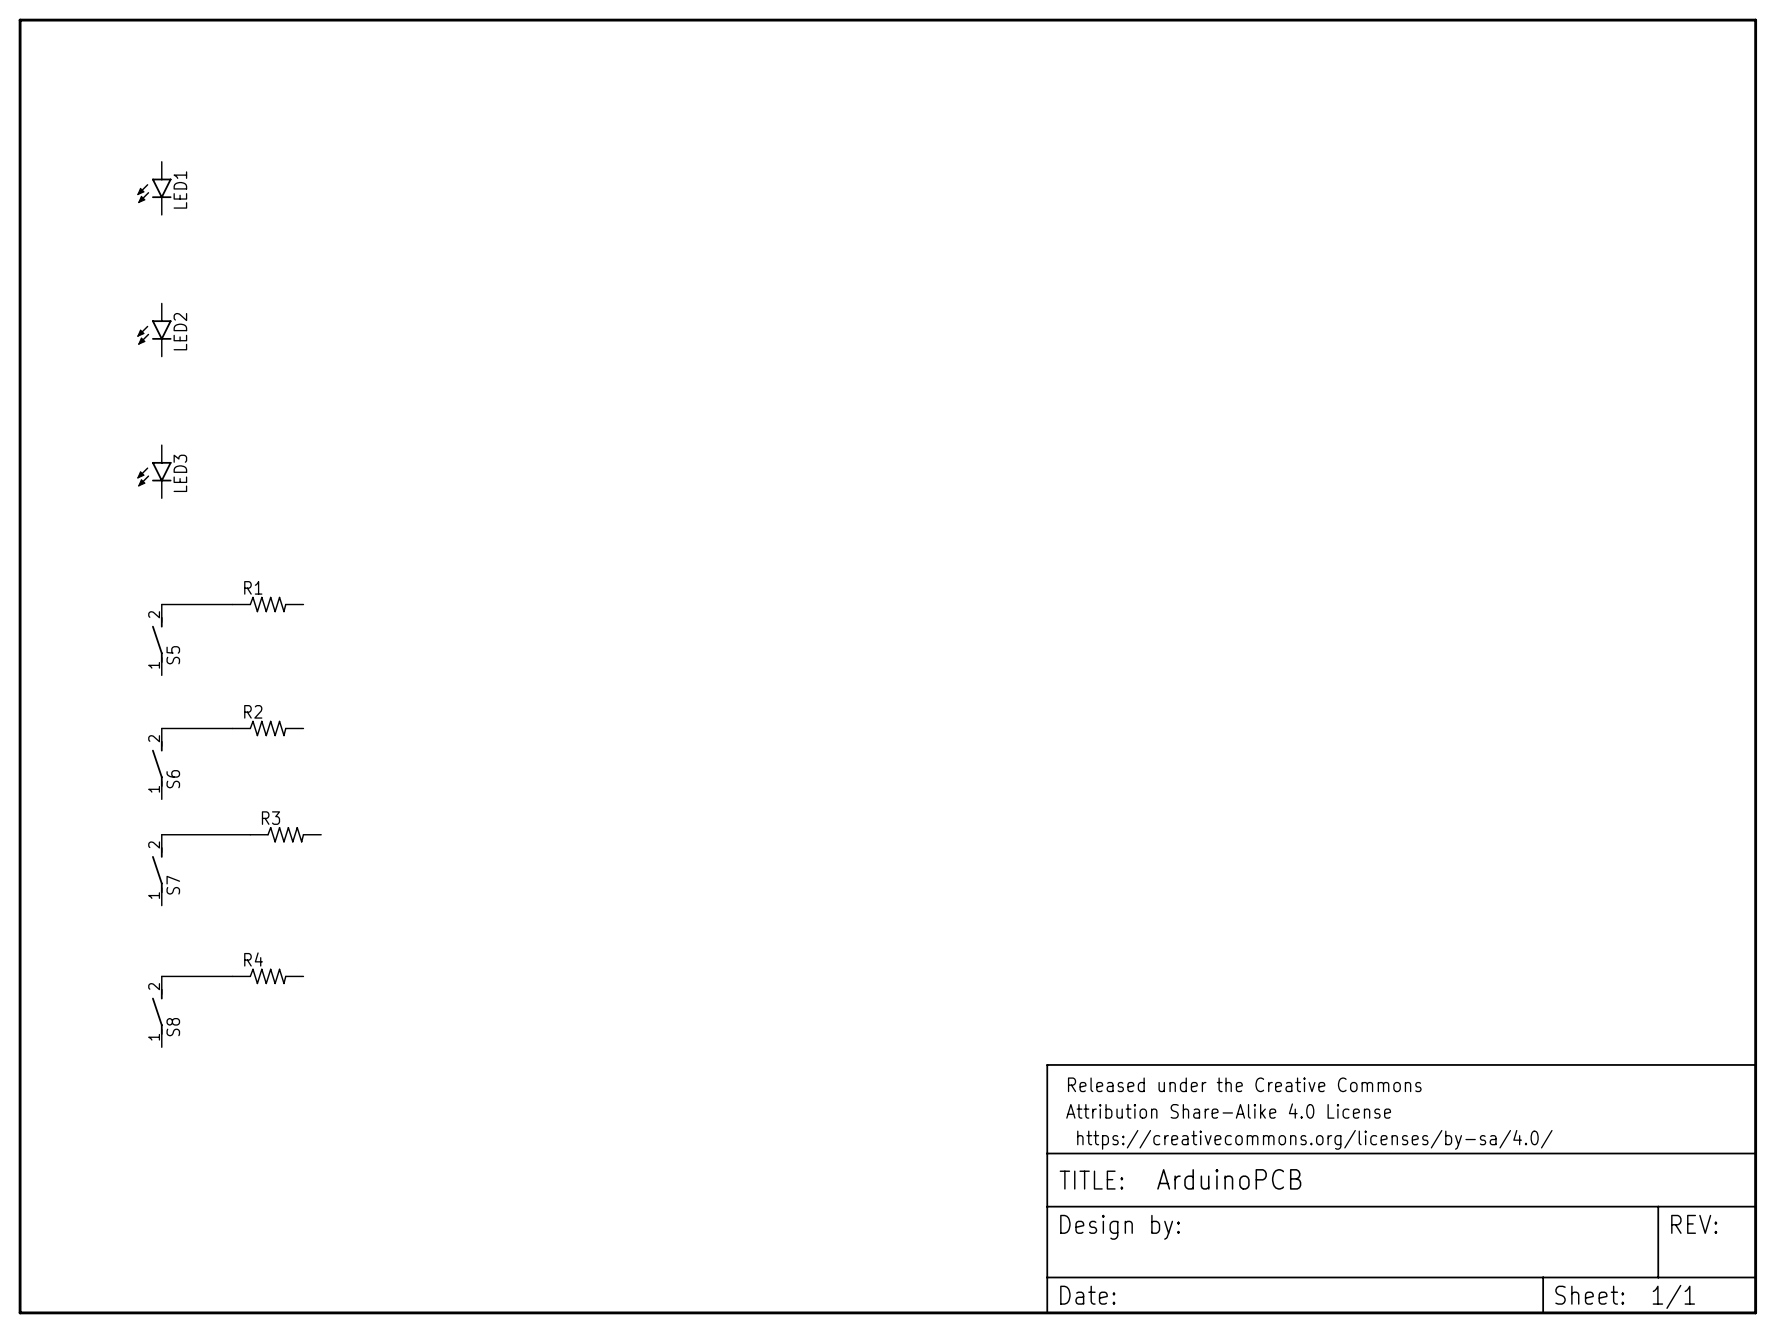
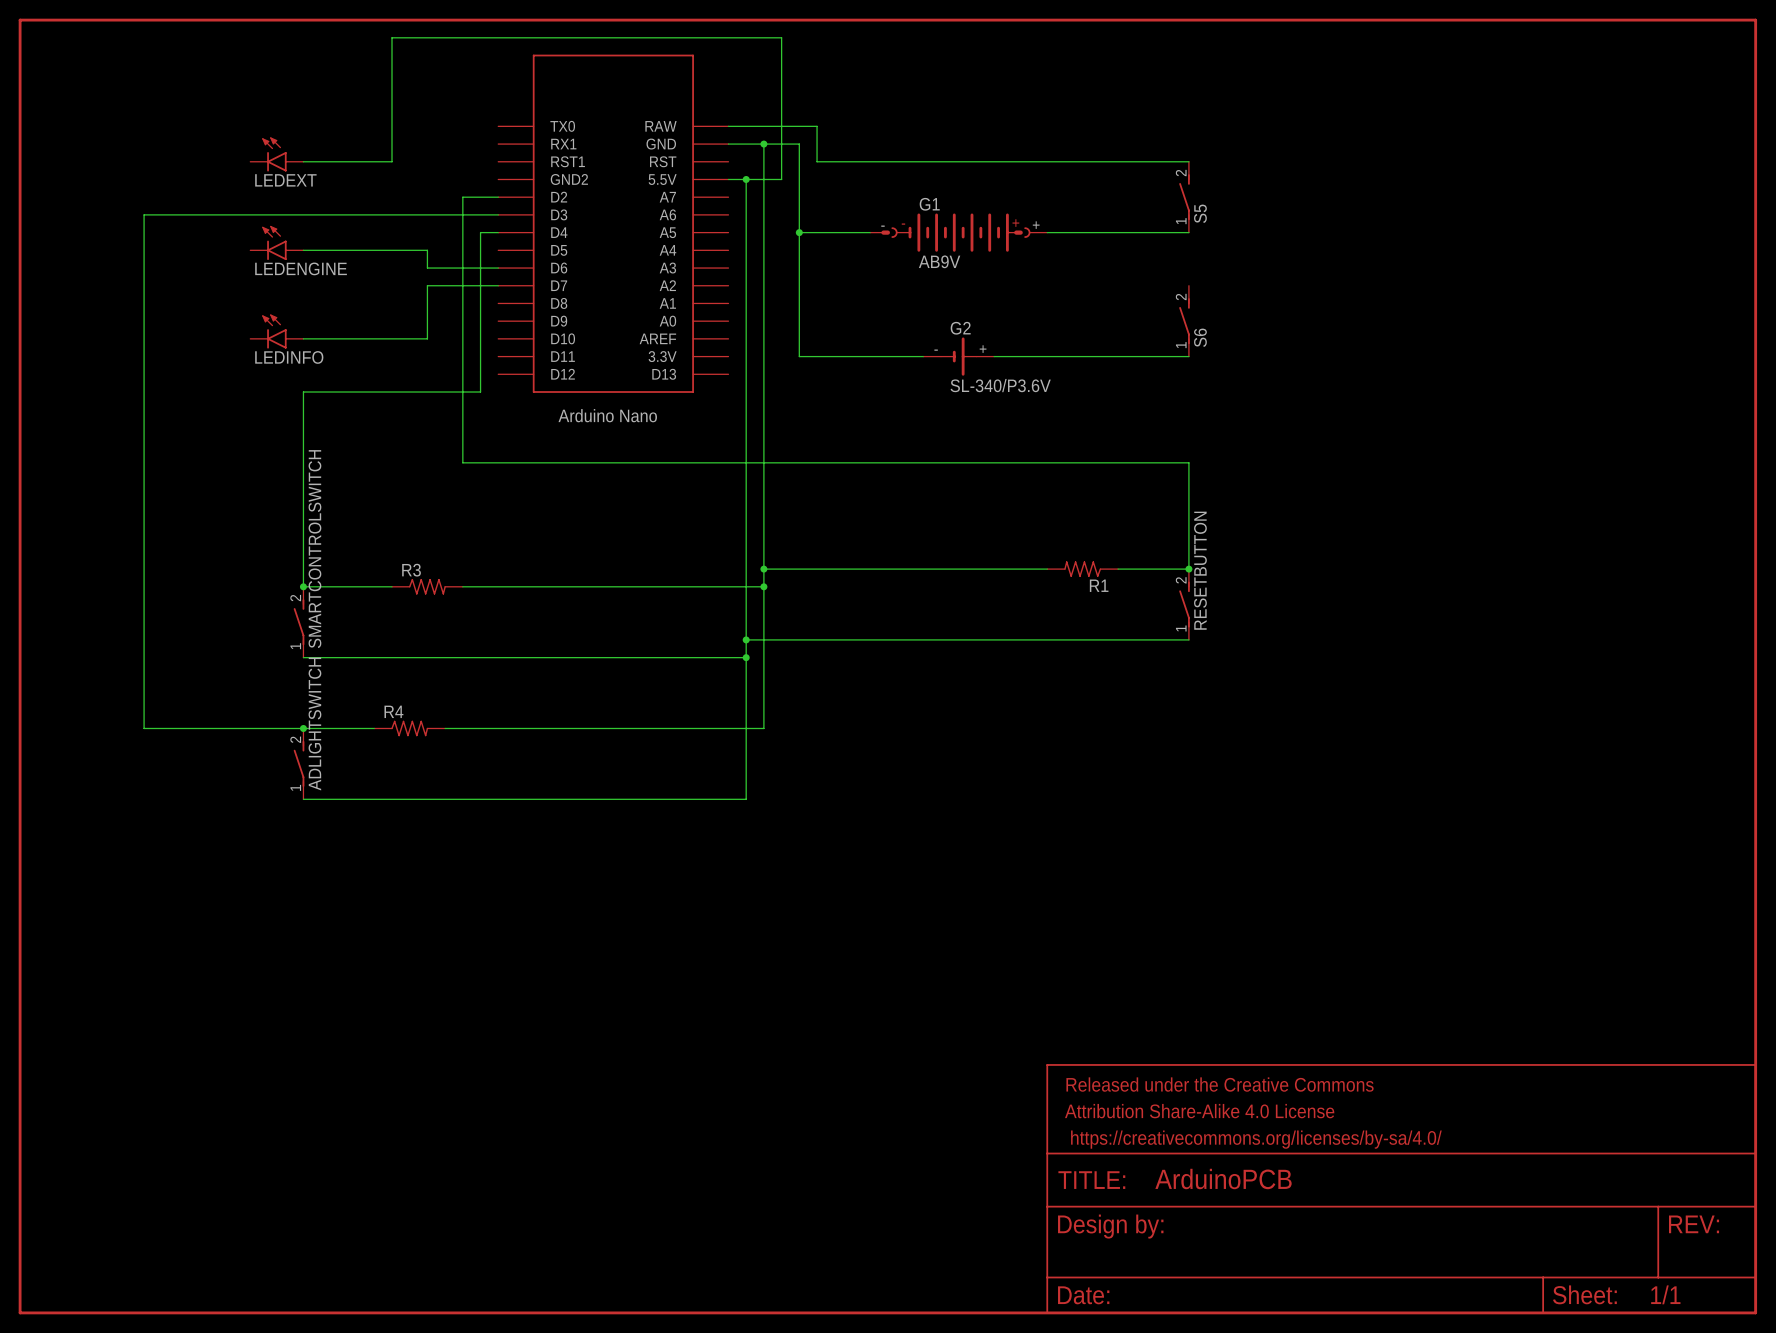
wire: none -> (728, 126) (817, 126) (817, 161) (1188, 161)
wire: none -> (728, 144) (799, 144) (799, 356) (923, 356)
wire: none -> (763, 144) (763, 728) (445, 728)
junction: none -> (763, 144)
LEDEXT: none -> (276, 154)
wire: none -> (303, 161) (392, 161) (392, 37) (781, 37) (781, 179) (728, 179)
wire: none -> (746, 179) (746, 799) (303, 799)
junction: none -> (746, 179)
LED1: (154, 188) -> none
wire: none -> (498, 197) (462, 197) (462, 462) (1188, 462) (1188, 569) (1118, 569)
wire: none -> (498, 214) (144, 214) (144, 728) (161, 728)
part: none -> (613, 223)
wire: none -> (498, 232) (480, 232) (480, 392) (303, 392) (303, 586) (392, 586)
wire: none -> (799, 232) (870, 232)
junction: none -> (799, 232)
G1: none -> AB9V (958, 232)
wire: none -> (1047, 232) (1188, 232)
LEDENGINE: none -> (276, 242)
wire: none -> (303, 250) (427, 250) (427, 268) (498, 268)
wire: none -> (498, 285) (427, 285) (427, 338) (303, 338)
LED2: (154, 330) -> none
LEDINFO: none -> (276, 331)
G2: none -> SL-340/P3.6V (958, 356)
wire: none -> (994, 356) (1188, 356)
LED3: (154, 471) -> none
wire: none -> (763, 569) (1047, 569)
junction: none -> (763, 569)
junction: none -> (1188, 569)
junction: none -> (303, 586)
wire: none -> (462, 586) (763, 586)
junction: none -> (763, 586)
wire: (161, 604) (232, 604) -> none
R1 rotation: 0° (268, 604) -> 180° (1082, 569)
R1 position: (268, 604) -> (1082, 569)
RESETBUTTON: none -> (1184, 604)
SMARTCONTROLSWITCH: none -> (299, 622)
S5 position: (157, 639) -> (1184, 197)
wire: none -> (746, 639) (1188, 639)
junction: none -> (746, 639)
wire: none -> (303, 657) (746, 657)
junction: none -> (746, 657)
wire: none -> (232, 728) (374, 728)
R2: (268, 728) -> none
junction: none -> (303, 728)
S6 position: (157, 763) -> (1184, 321)
ADLIGHTSWITCH: none -> (299, 763)
wire: (161, 834) (250, 834) -> none
R3 position: (285, 834) -> (427, 586)
S7: (157, 870) -> none
wire: (161, 976) (232, 976) -> none
R4 position: (268, 976) -> (409, 728)
S8: (157, 1011) -> none

